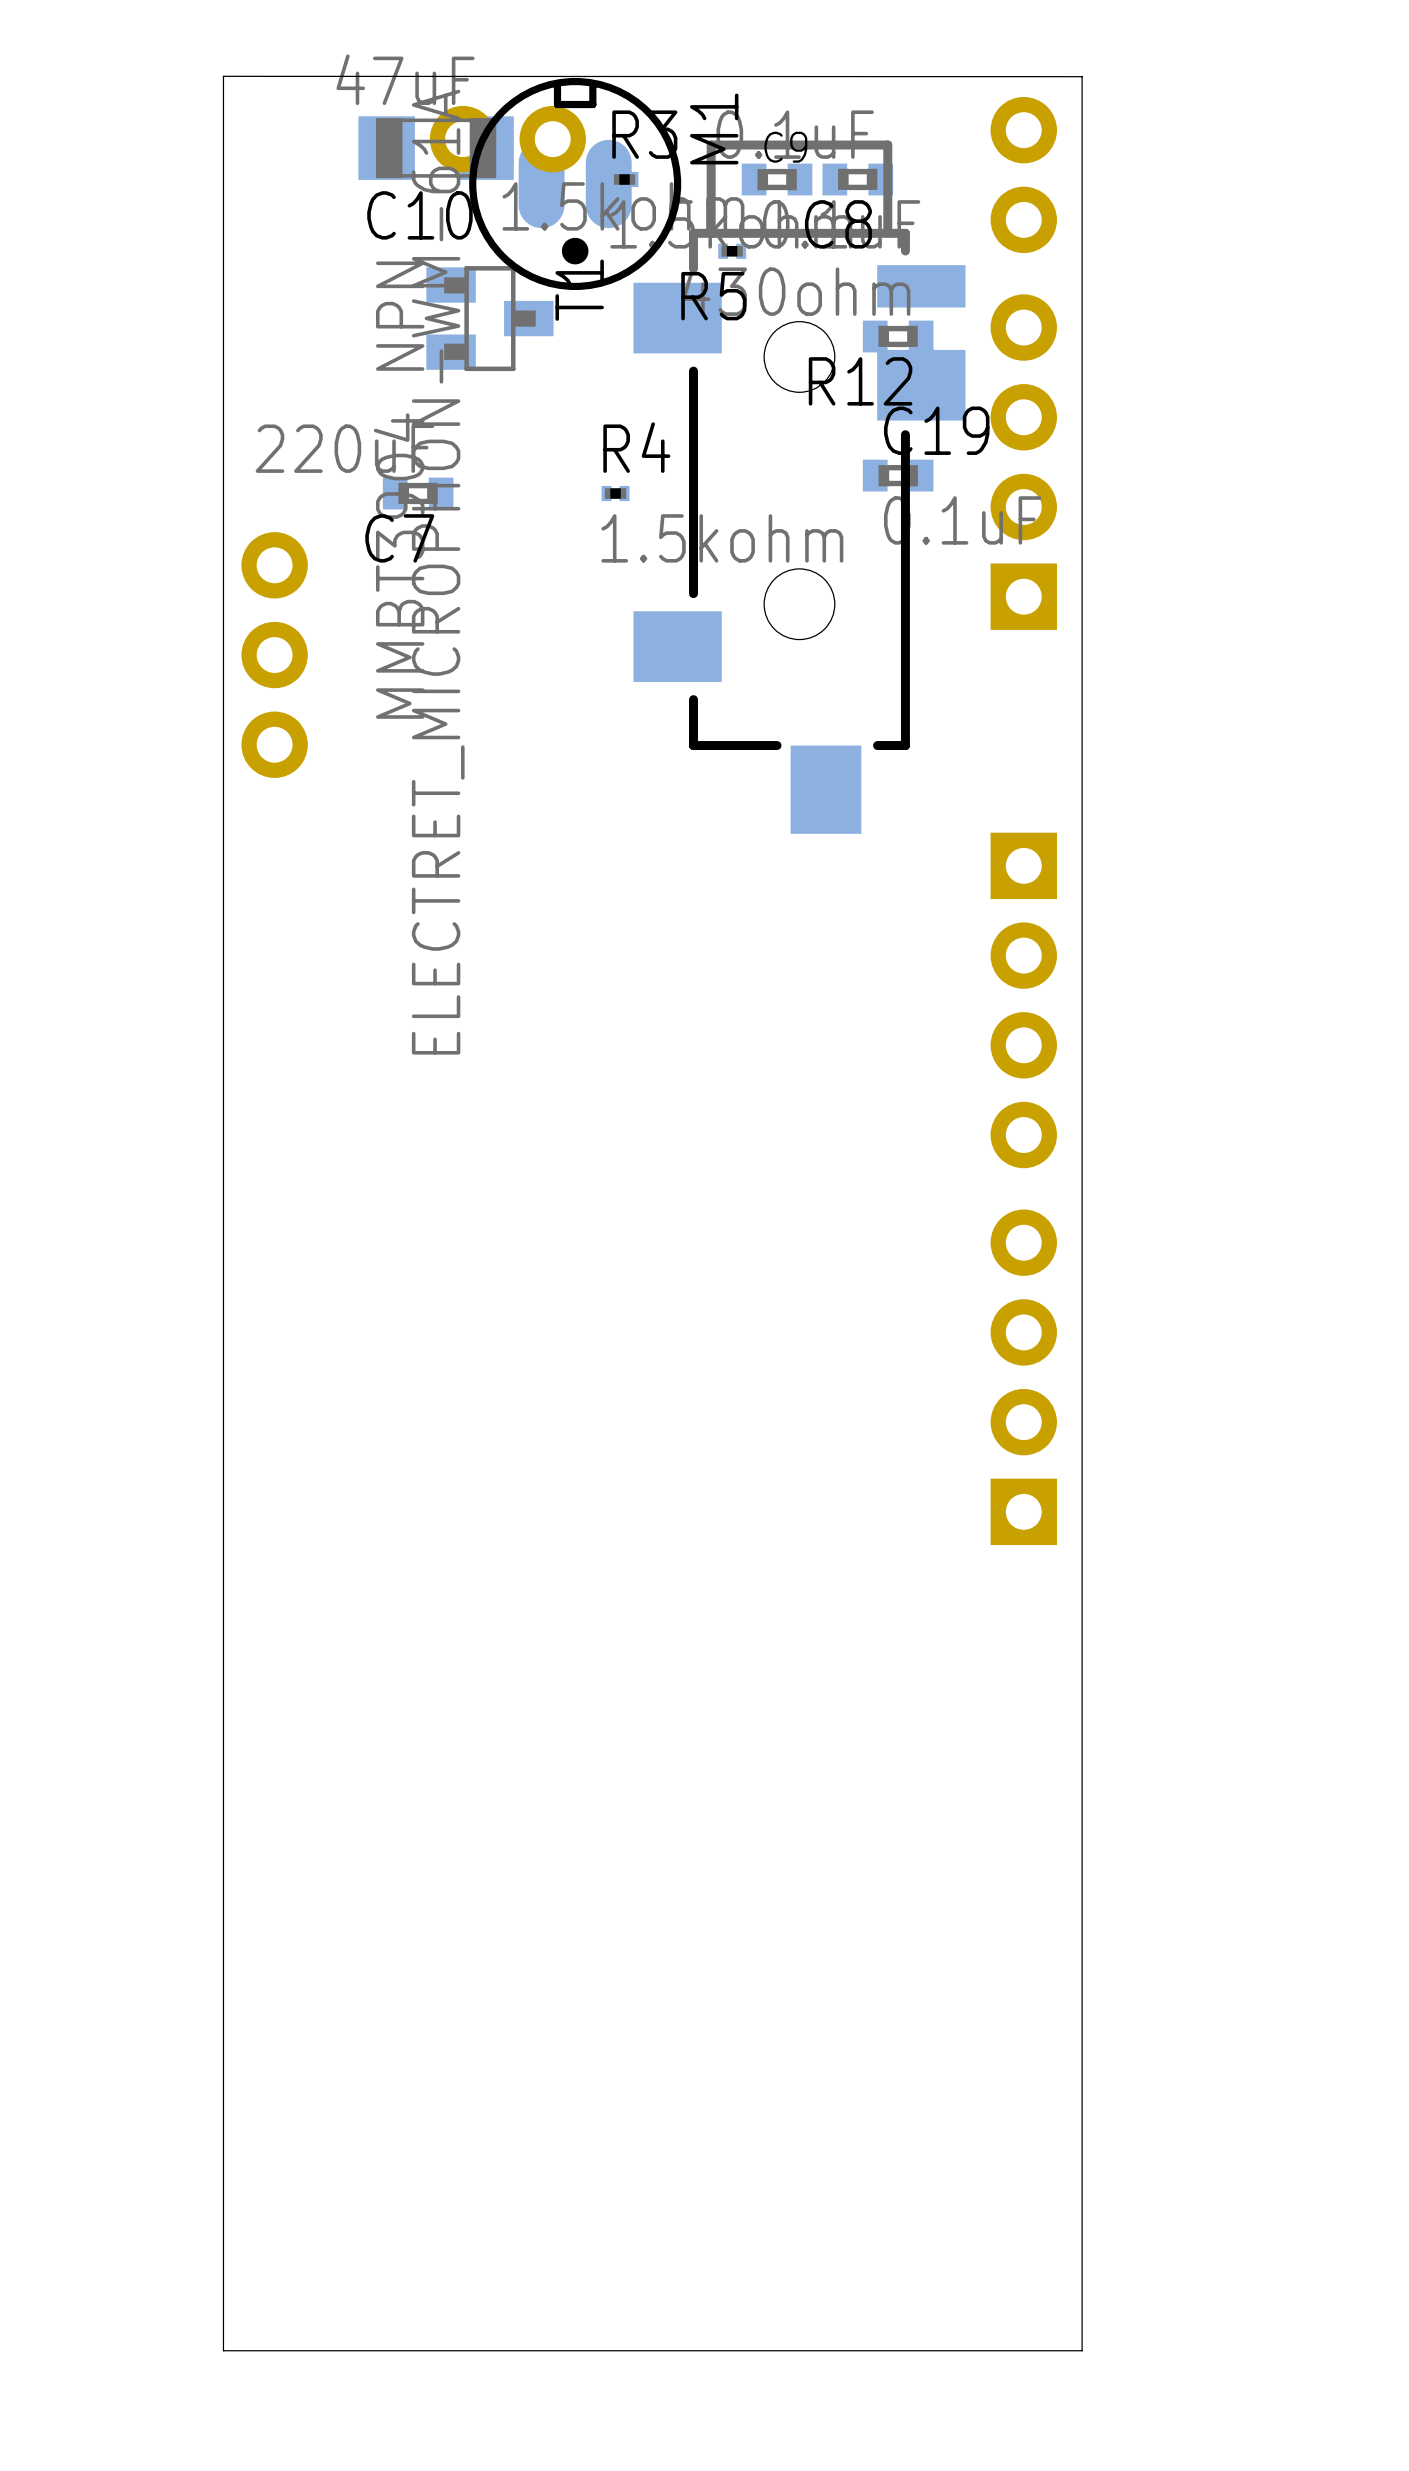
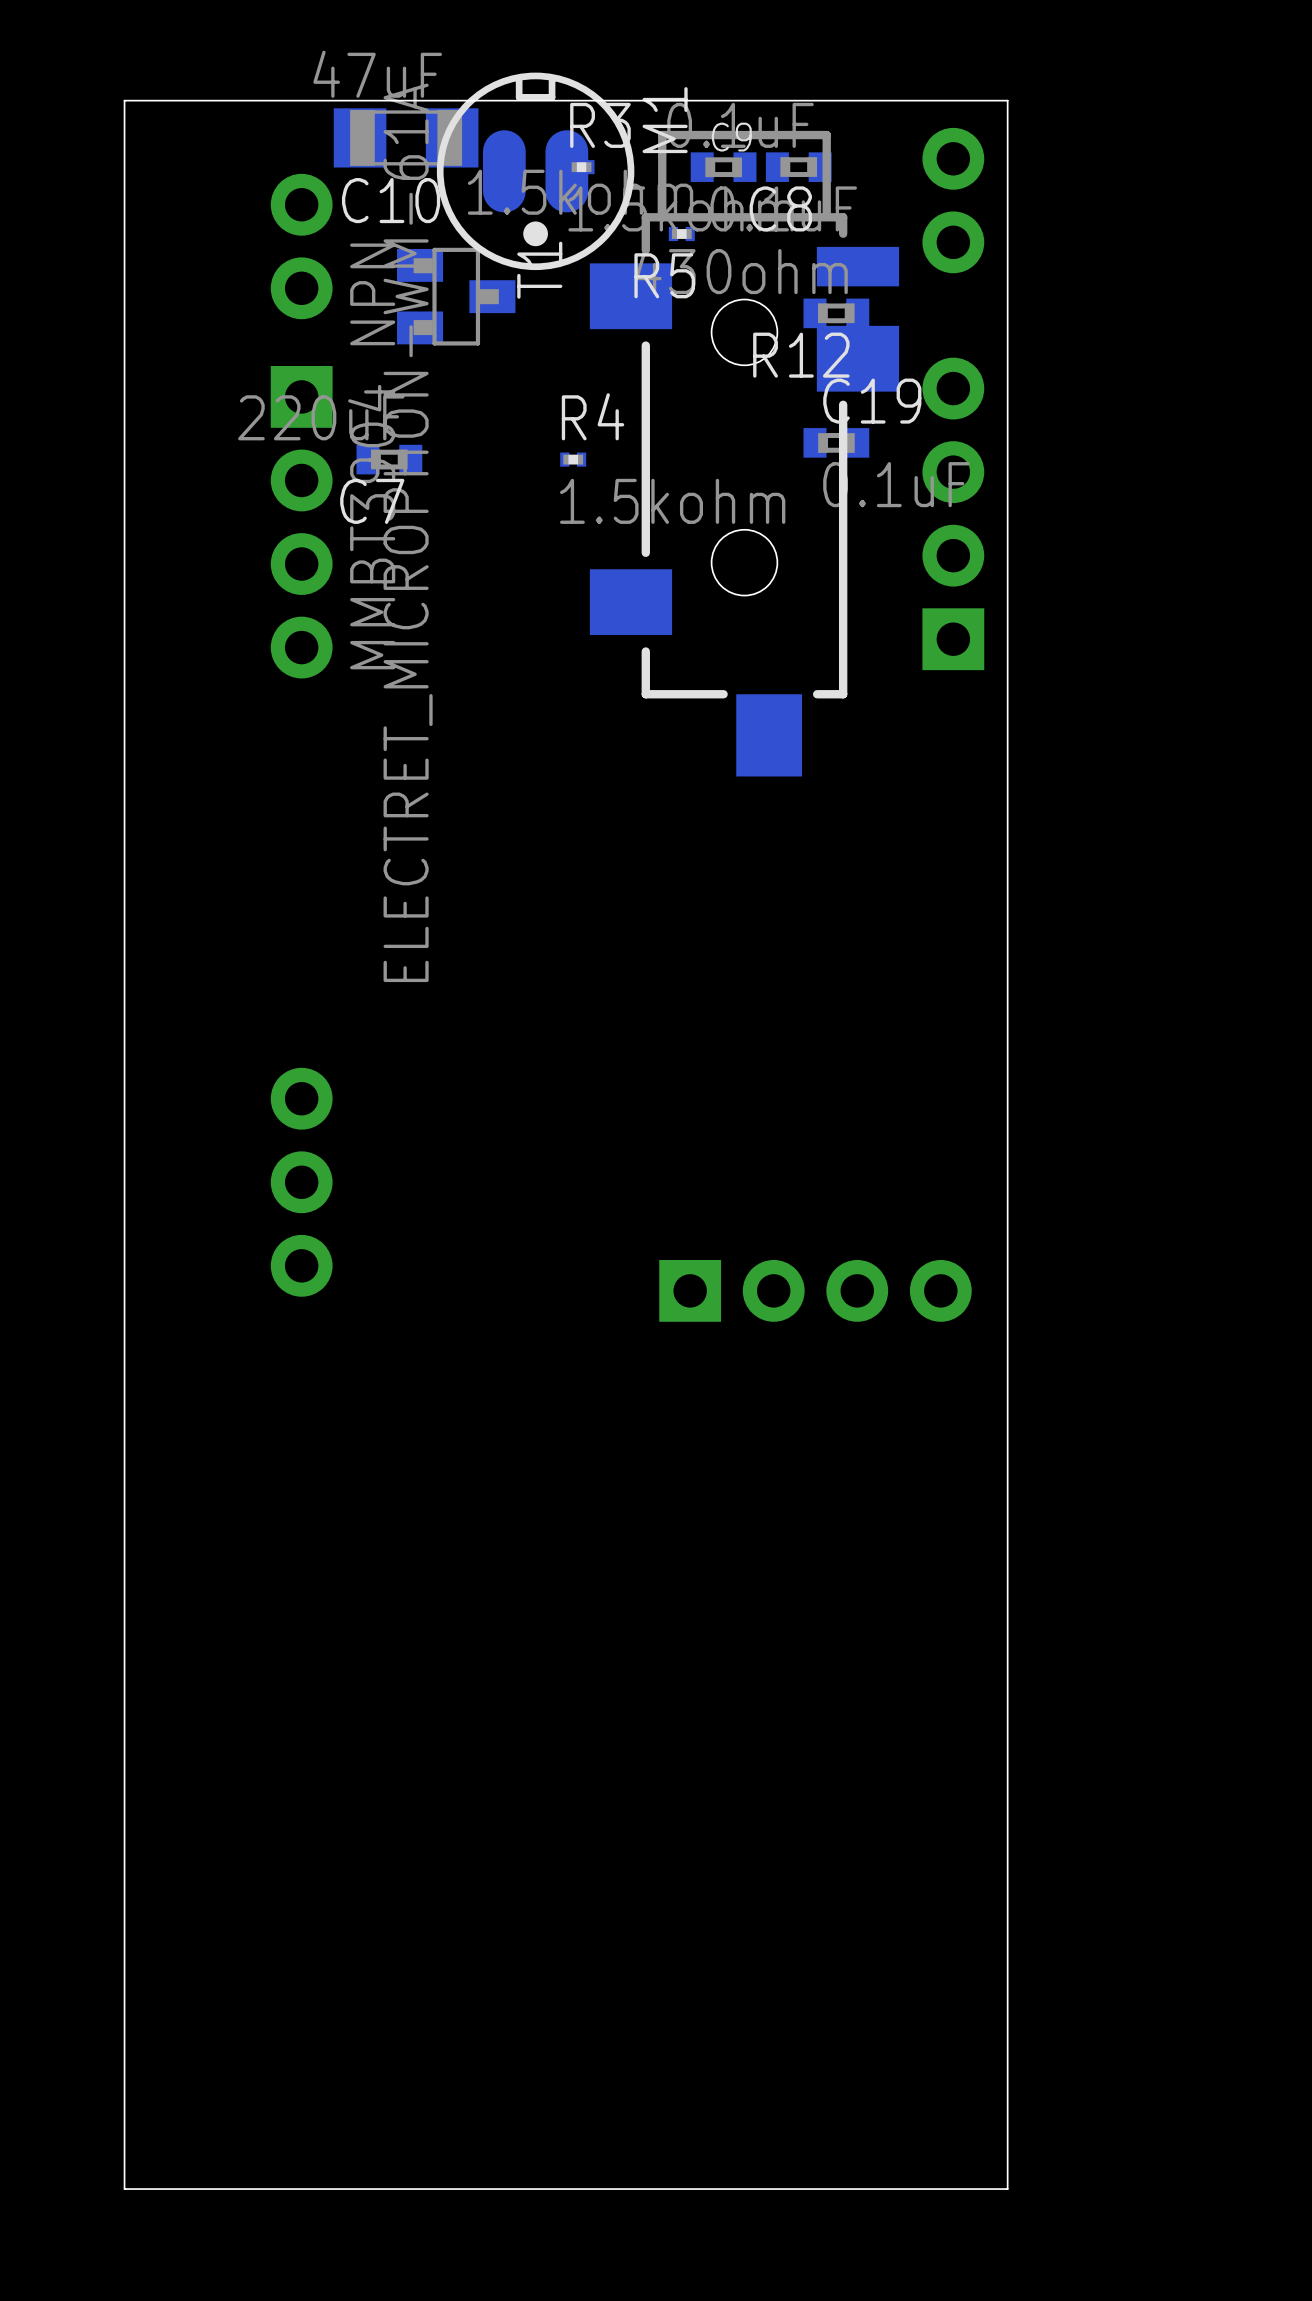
board edge: (1082, 108) (1082, 76) (223, 76) (223, 2350) -> (1007, 100) (124, 100) (124, 2189) (208, 2189)
part rotation: 0° (507, 139) -> 90° clockwise (301, 246)
part position: (507, 139) -> (301, 246)
part position: (1023, 175) -> (953, 200)
part position: (1023, 462) -> (953, 513)
part: none -> (301, 522)
part position: (274, 655) -> (301, 1182)
part: (1023, 1000) -> none
part rotation: 0° (1023, 1377) -> 90° clockwise (815, 1290)

